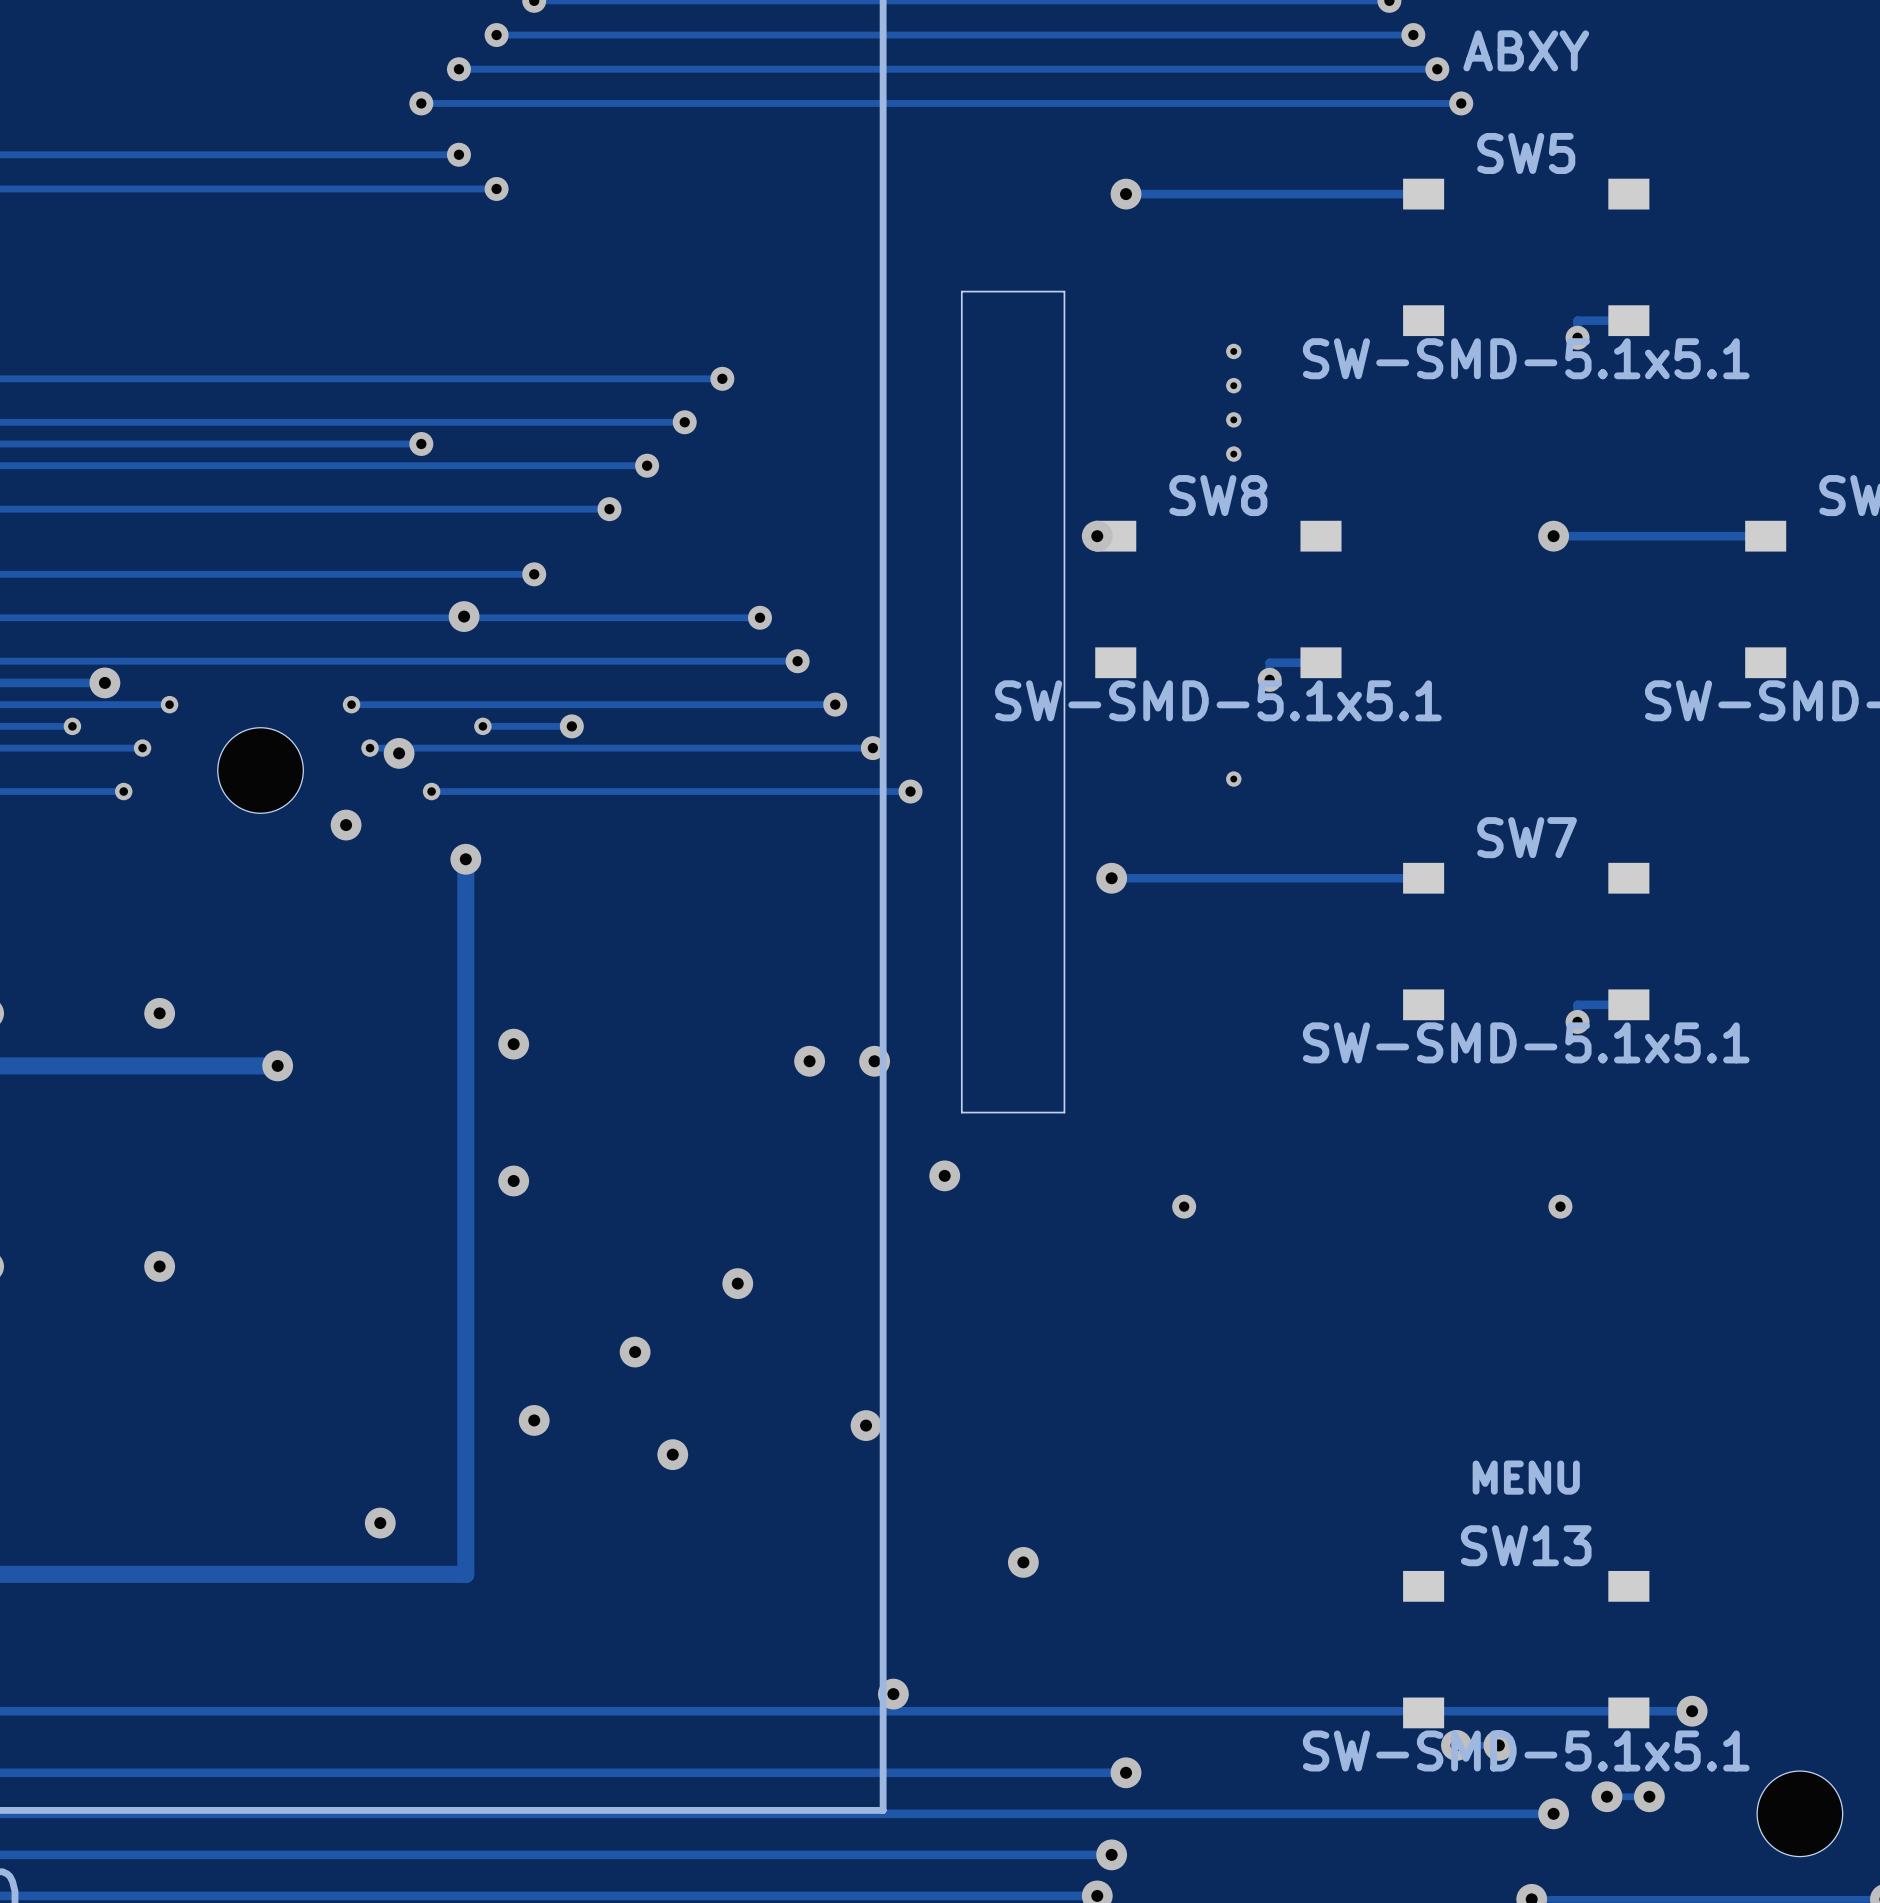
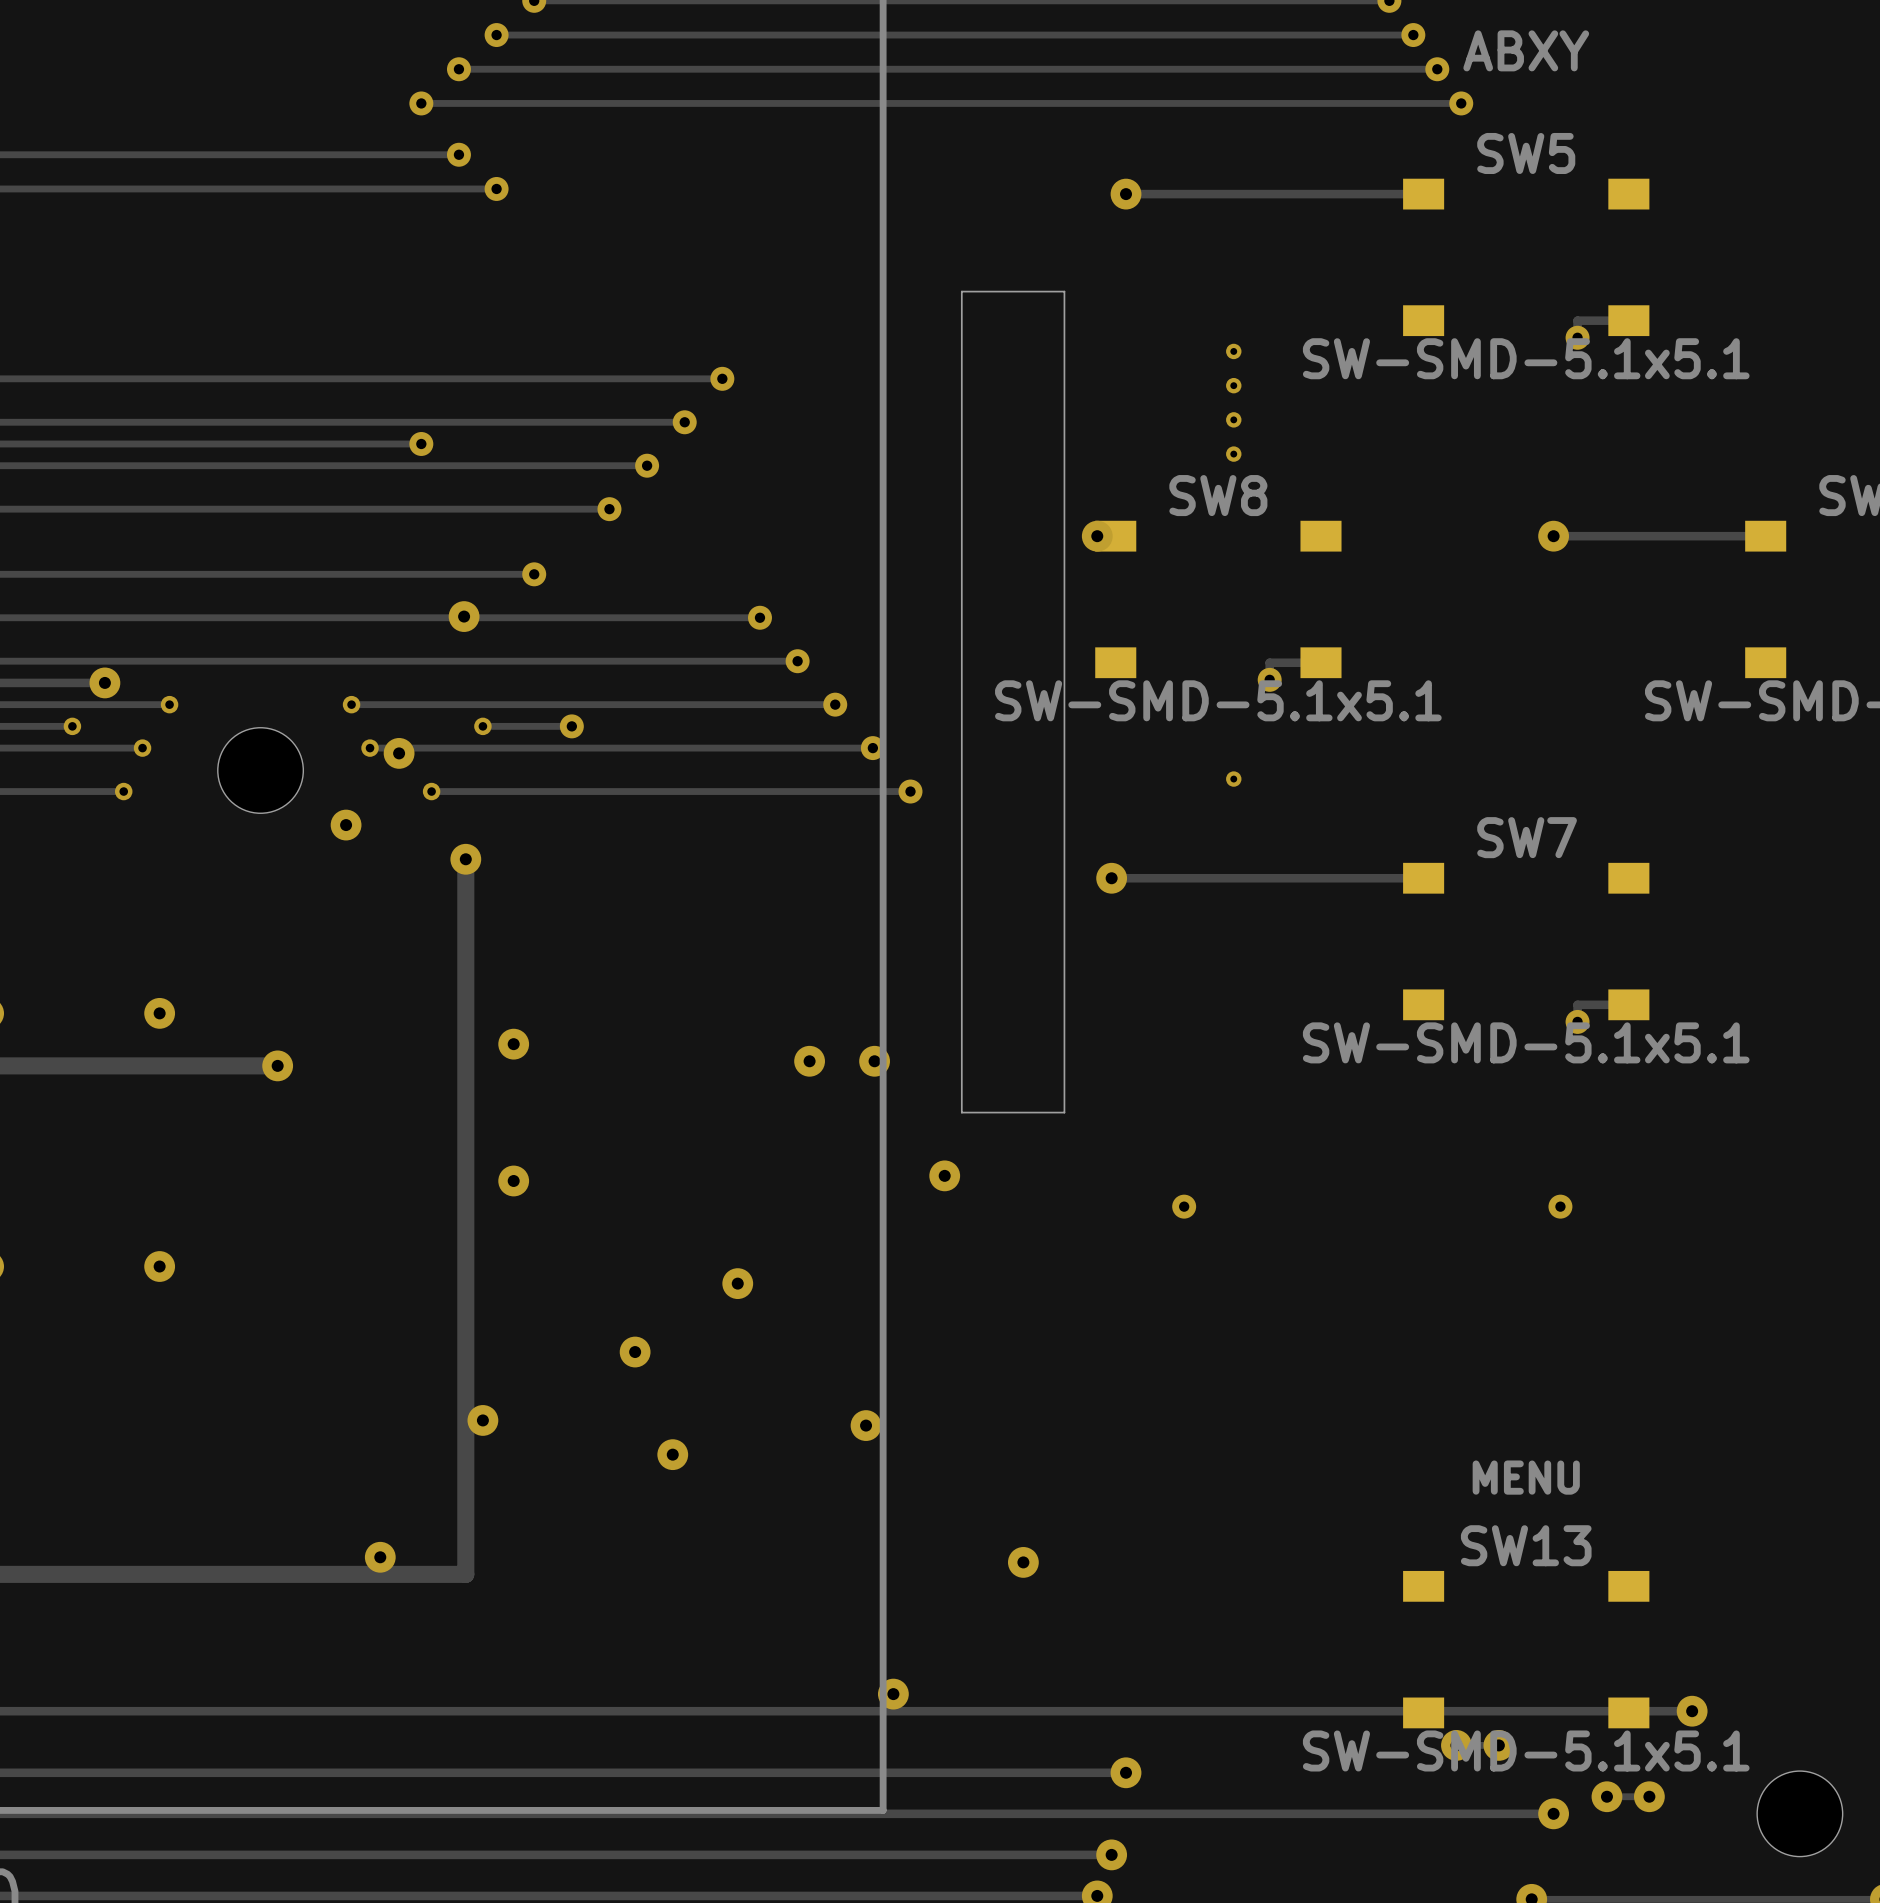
via position: (534, 1420) -> (482, 1420)
via position: (380, 1523) -> (380, 1557)

